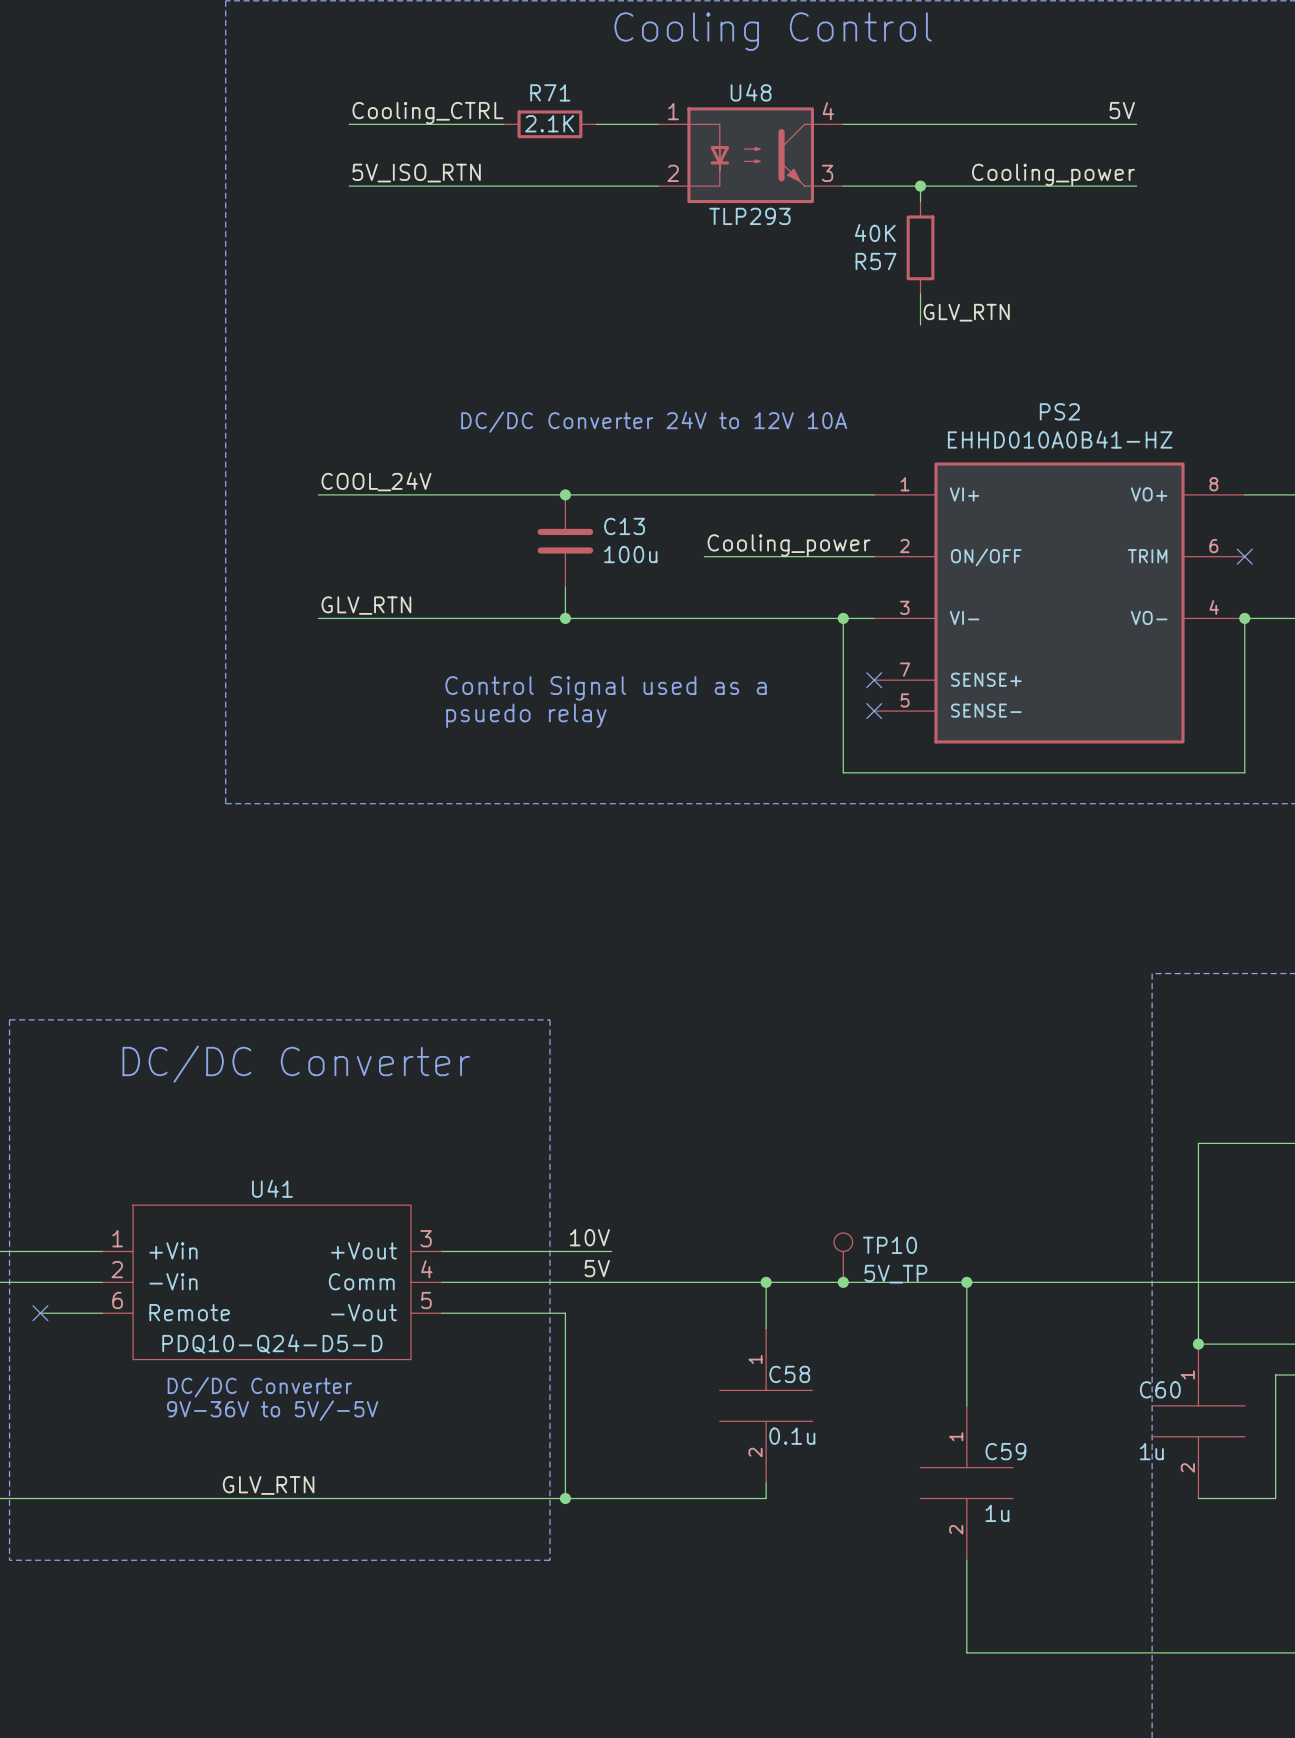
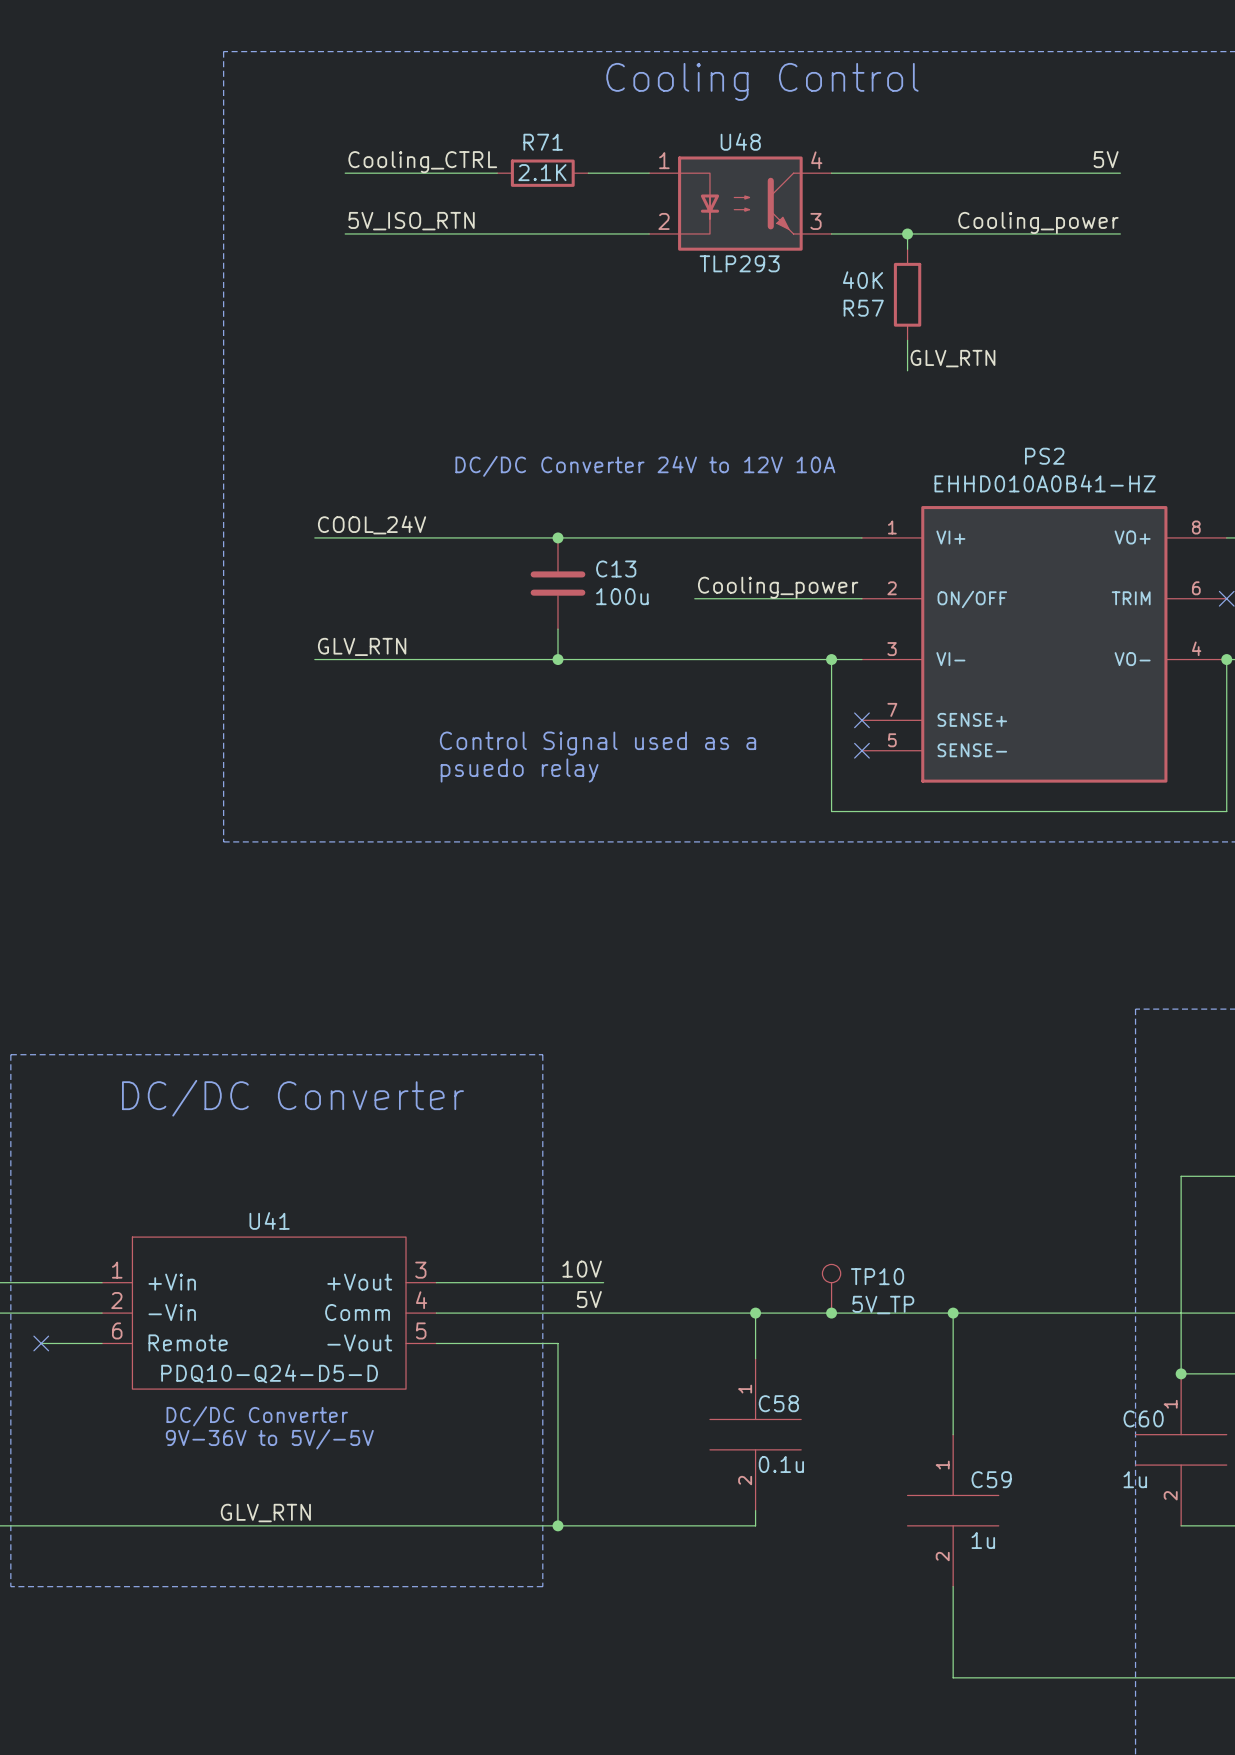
text position: Control Signal used as a (606, 688) -> Control Signal used as a (598, 743)
text position: psuedo relay (526, 715) -> psuedo relay (519, 770)

